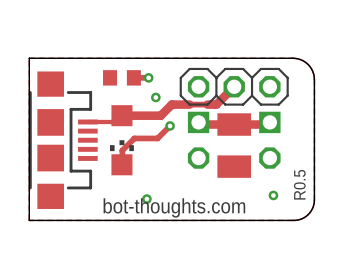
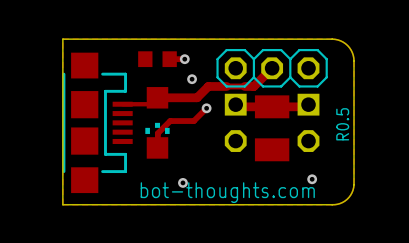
text position: R0.5 (299, 184) -> R0.5 (342, 124)

